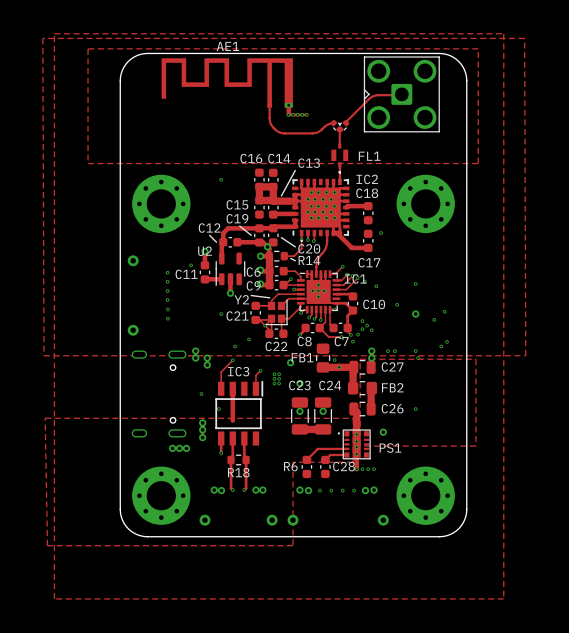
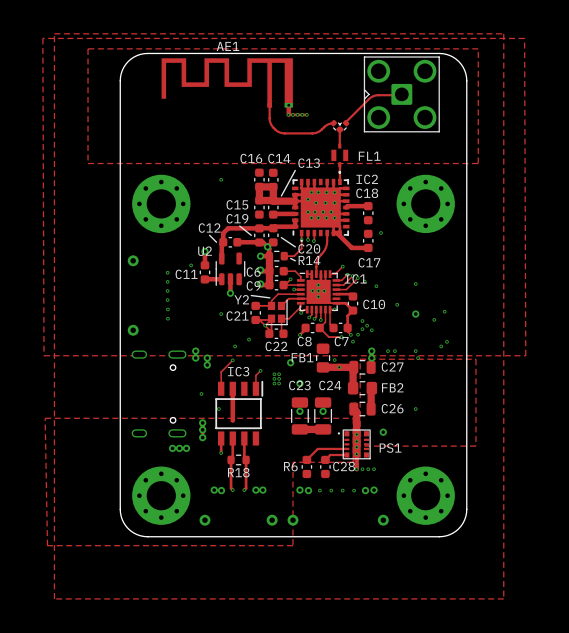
via: (314, 199) -> none
via: (323, 199) -> none
via: (331, 199) -> none
via: none -> (316, 202)
via: none -> (325, 202)
via: none -> (334, 202)
via: (311, 206) -> none
via: (318, 206) -> none
via: (326, 206) -> none
via: (334, 206) -> none

